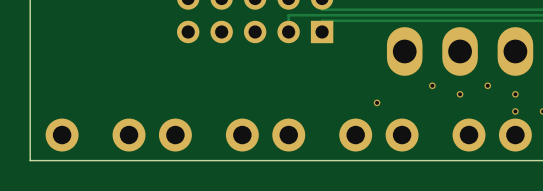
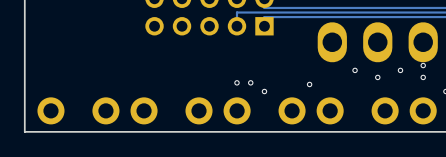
via: none -> (423, 65)
via: none -> (236, 82)
via: none -> (250, 82)
via: none -> (264, 91)
via: (515, 111) -> none

